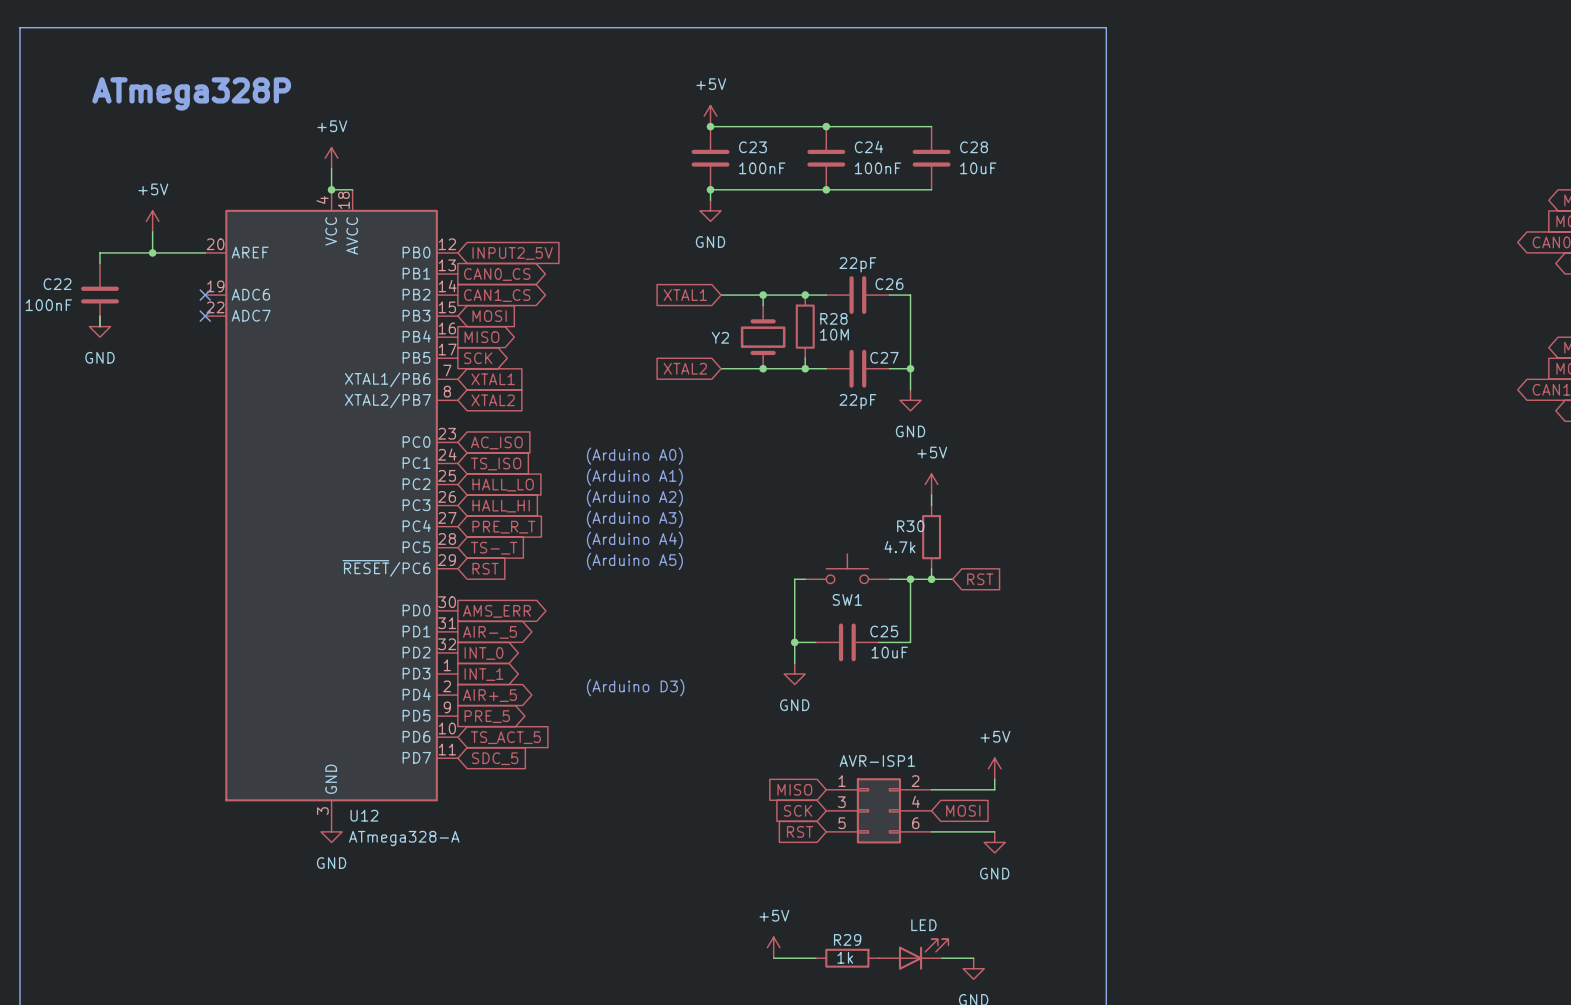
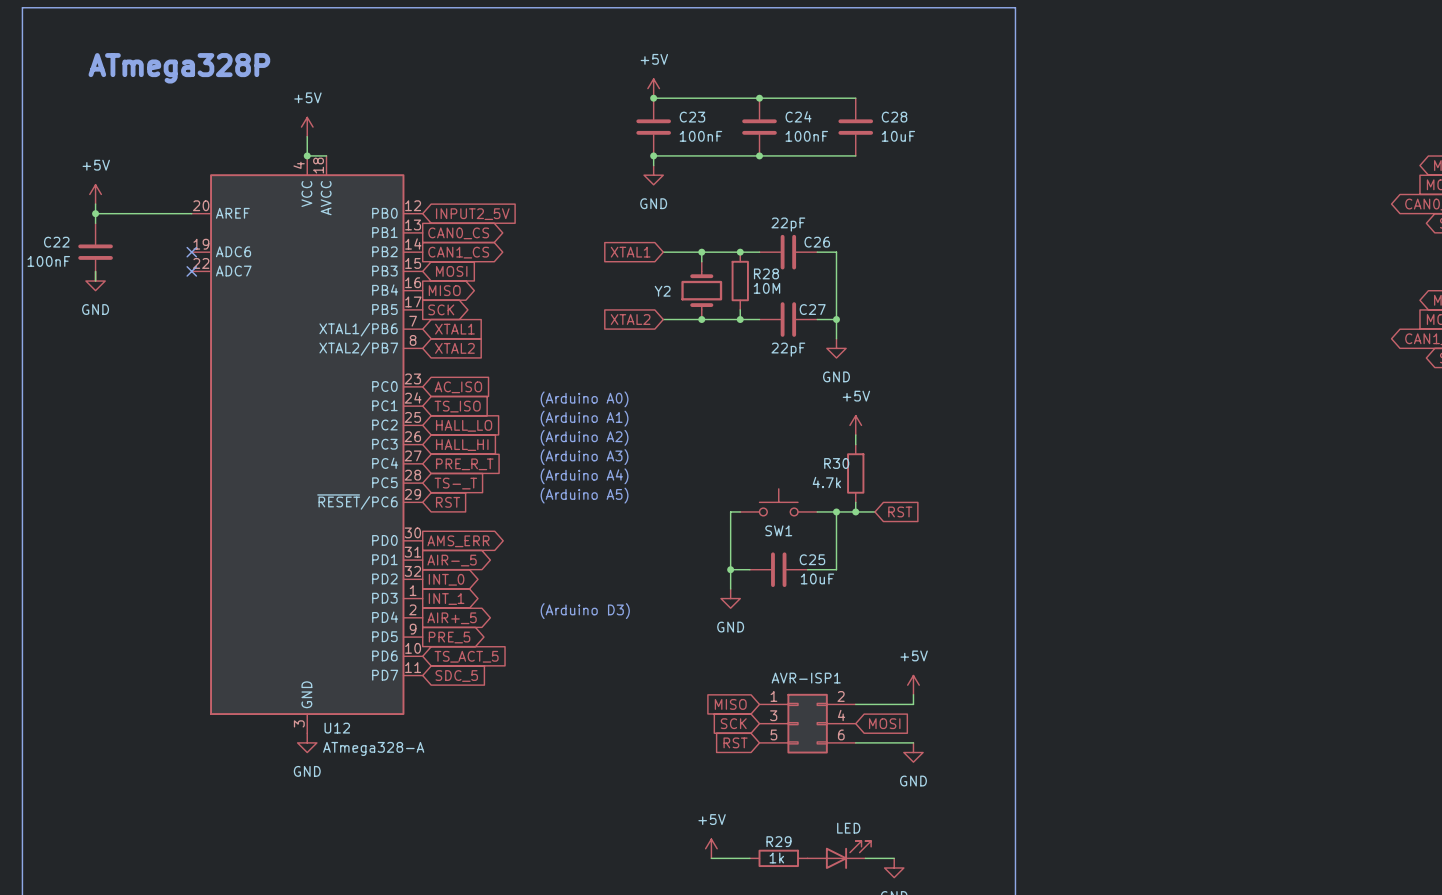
power symbol position: +5V (152, 221) -> +5V (95, 194)
wire: (152, 231) (152, 252) -> none
wire: none -> (95, 204) (95, 213)
junction: none -> (95, 213)
junction: (152, 252) -> none

